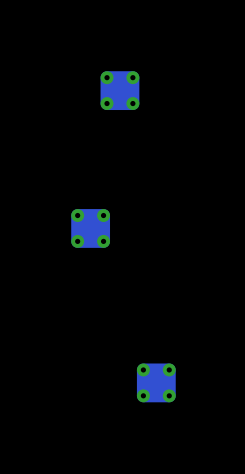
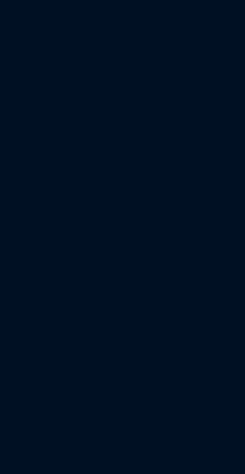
part: (119, 90) -> none
part: (90, 228) -> none
part: (156, 382) -> none

